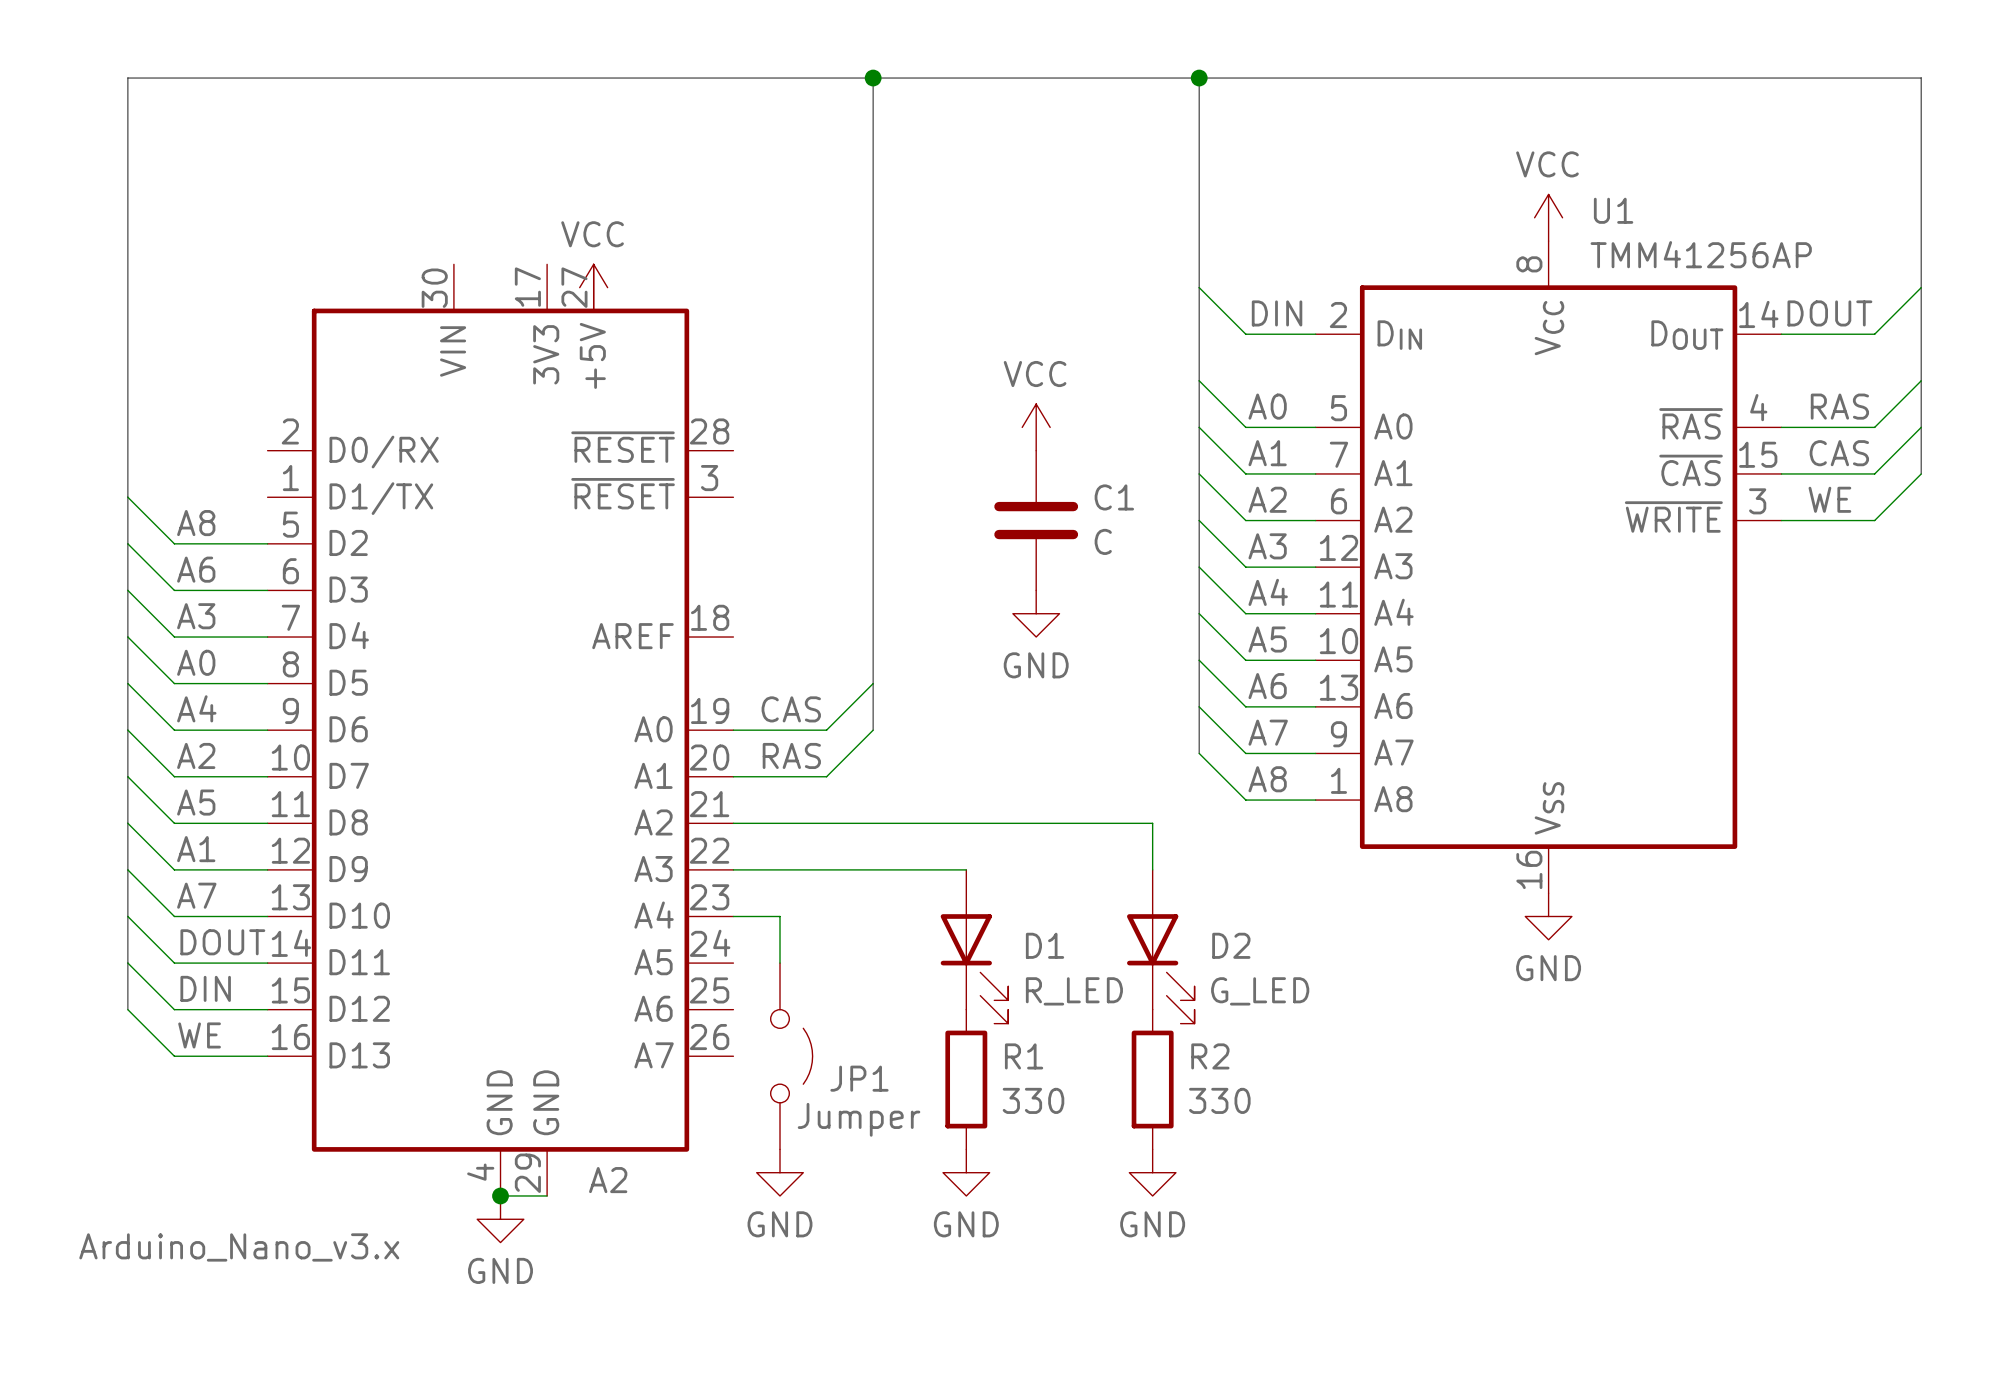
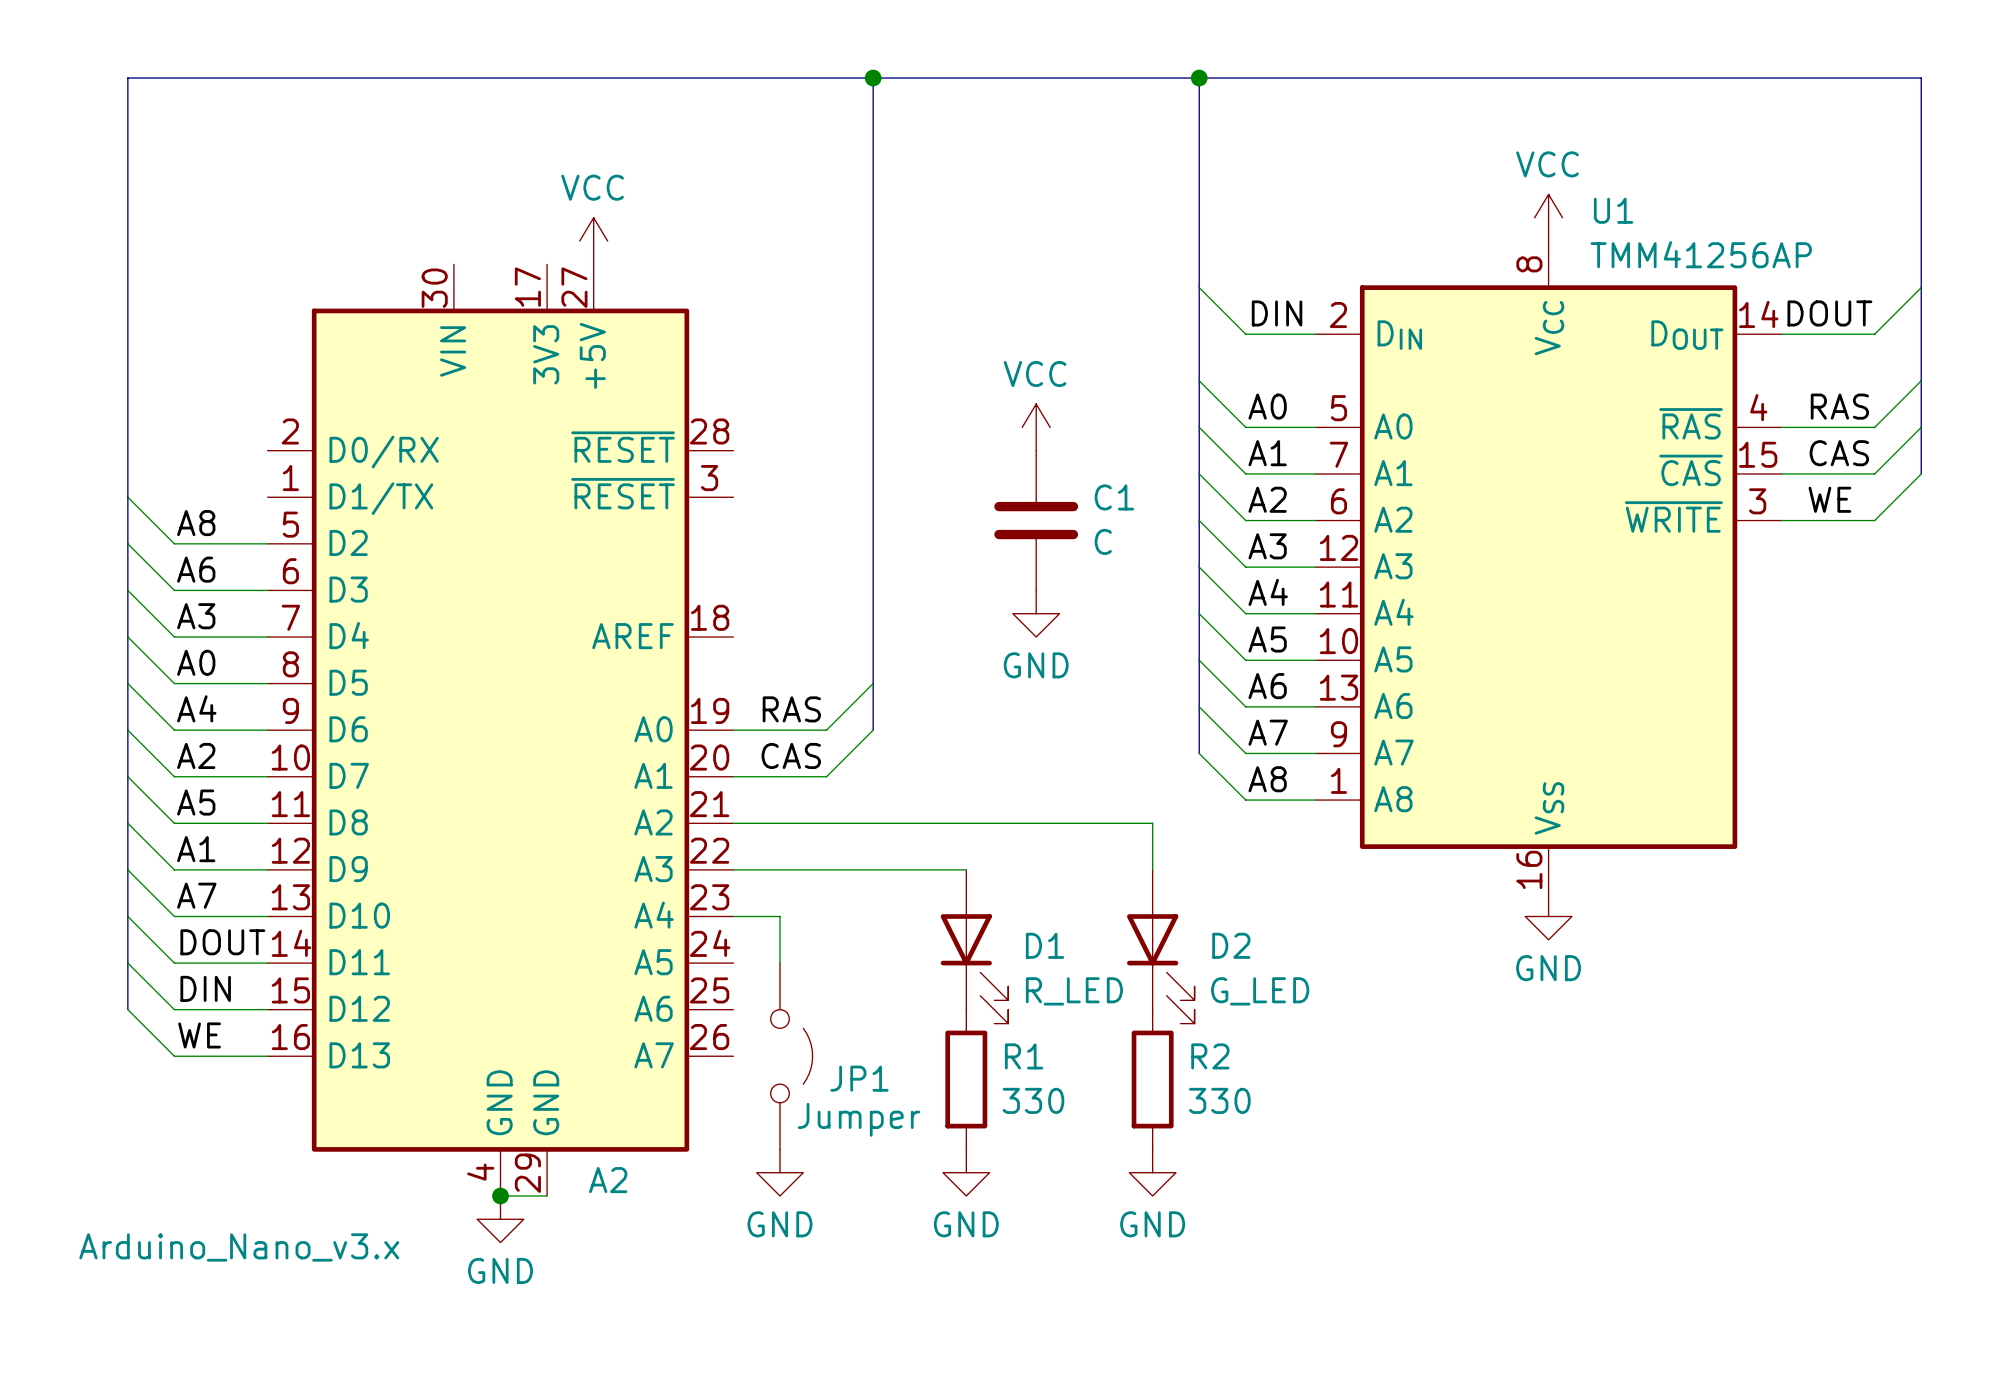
power symbol position: VCC (593, 287) -> VCC (593, 241)
label: CAS (791, 709) -> RAS (791, 709)
label: RAS (791, 755) -> CAS (791, 755)

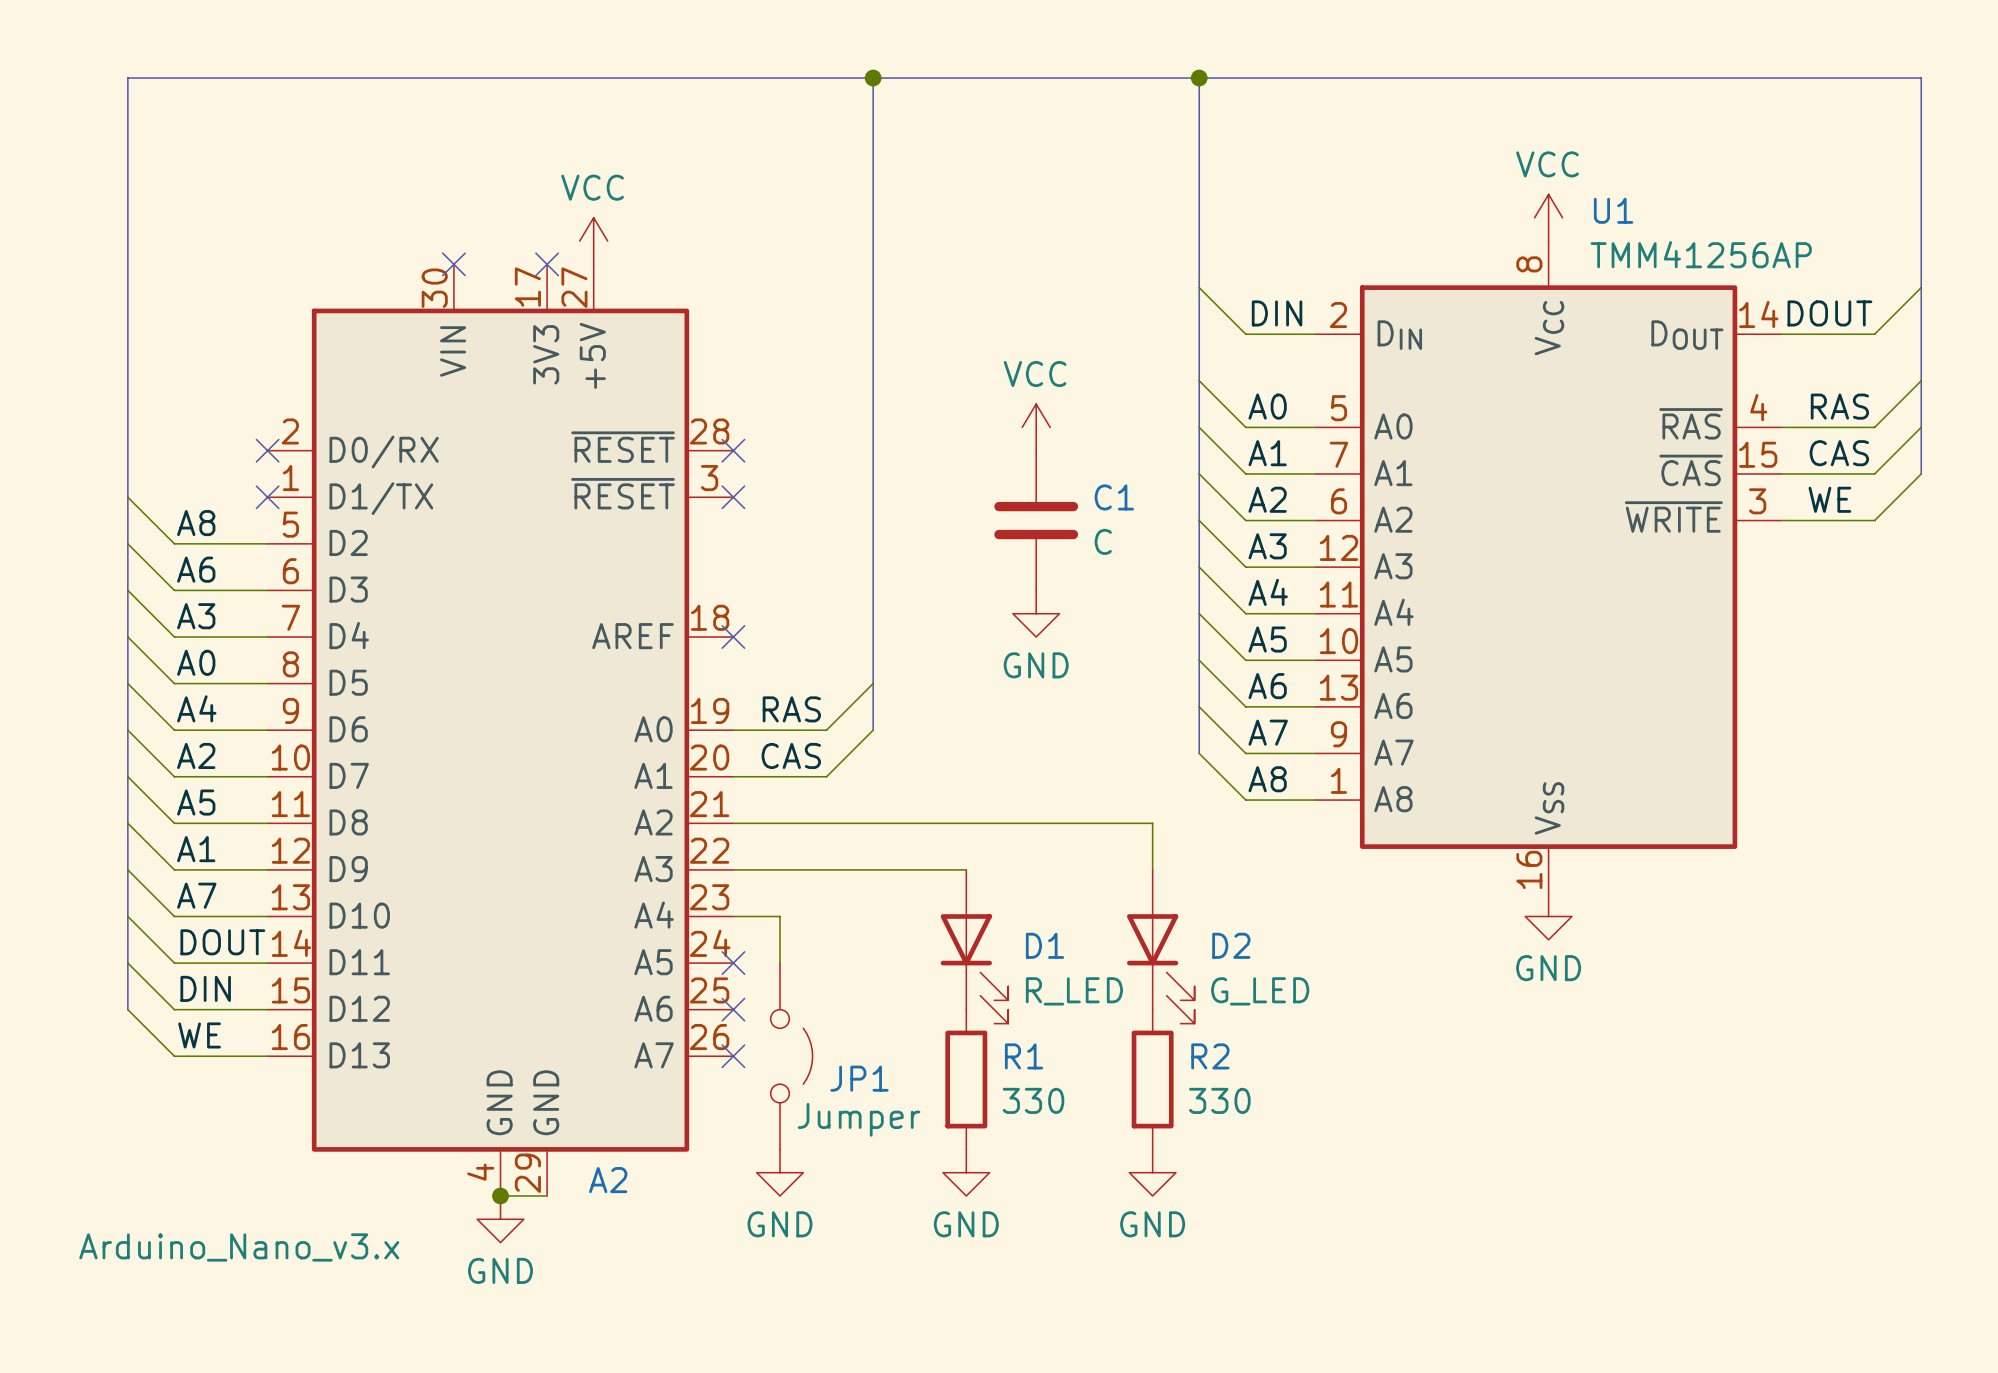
no-connect mark: none -> (453, 264)
no-connect mark: none -> (547, 264)
no-connect mark: none -> (267, 450)
no-connect mark: none -> (733, 450)
no-connect mark: none -> (267, 497)
no-connect mark: none -> (733, 497)
no-connect mark: none -> (733, 637)
no-connect mark: none -> (733, 963)
no-connect mark: none -> (733, 1009)
no-connect mark: none -> (733, 1056)

